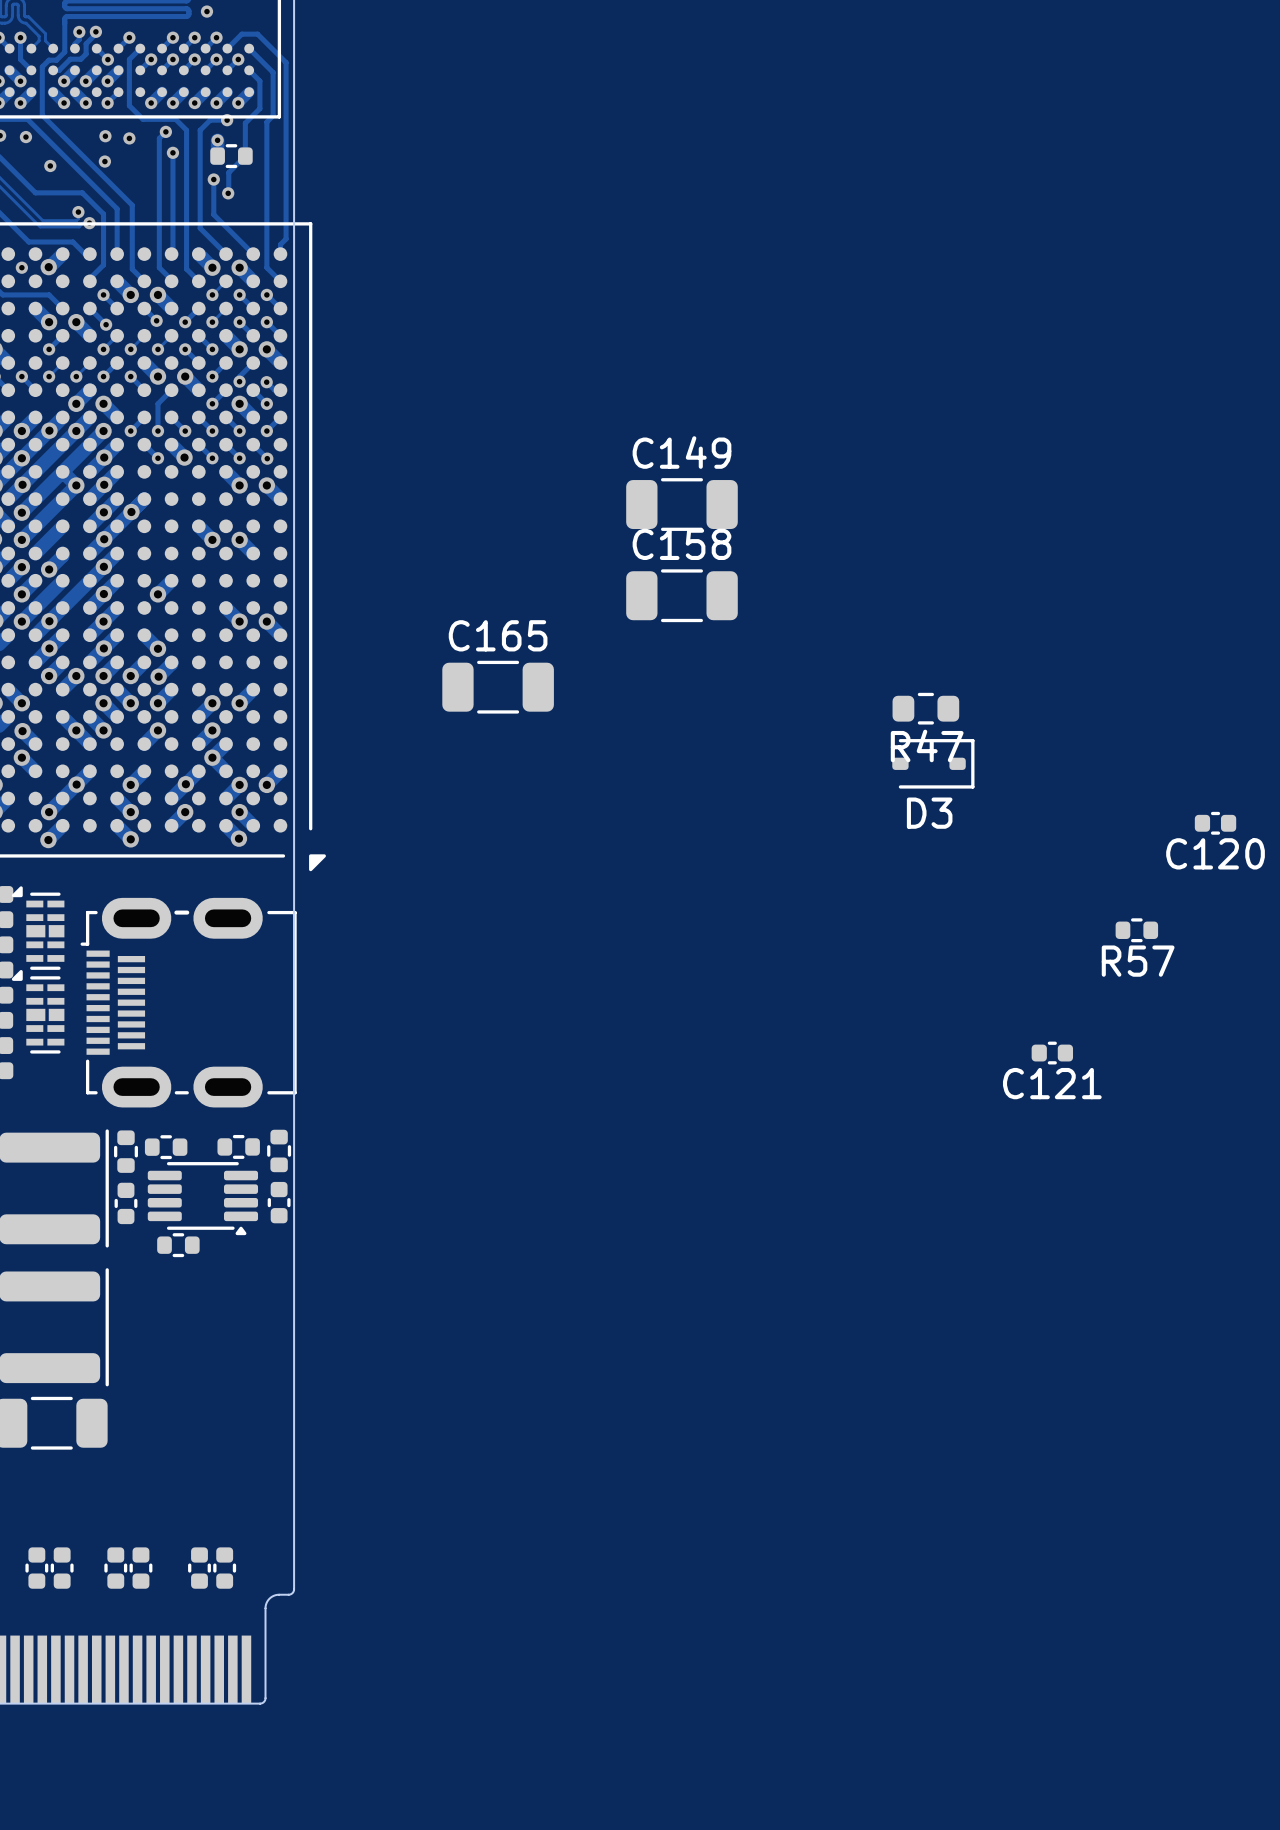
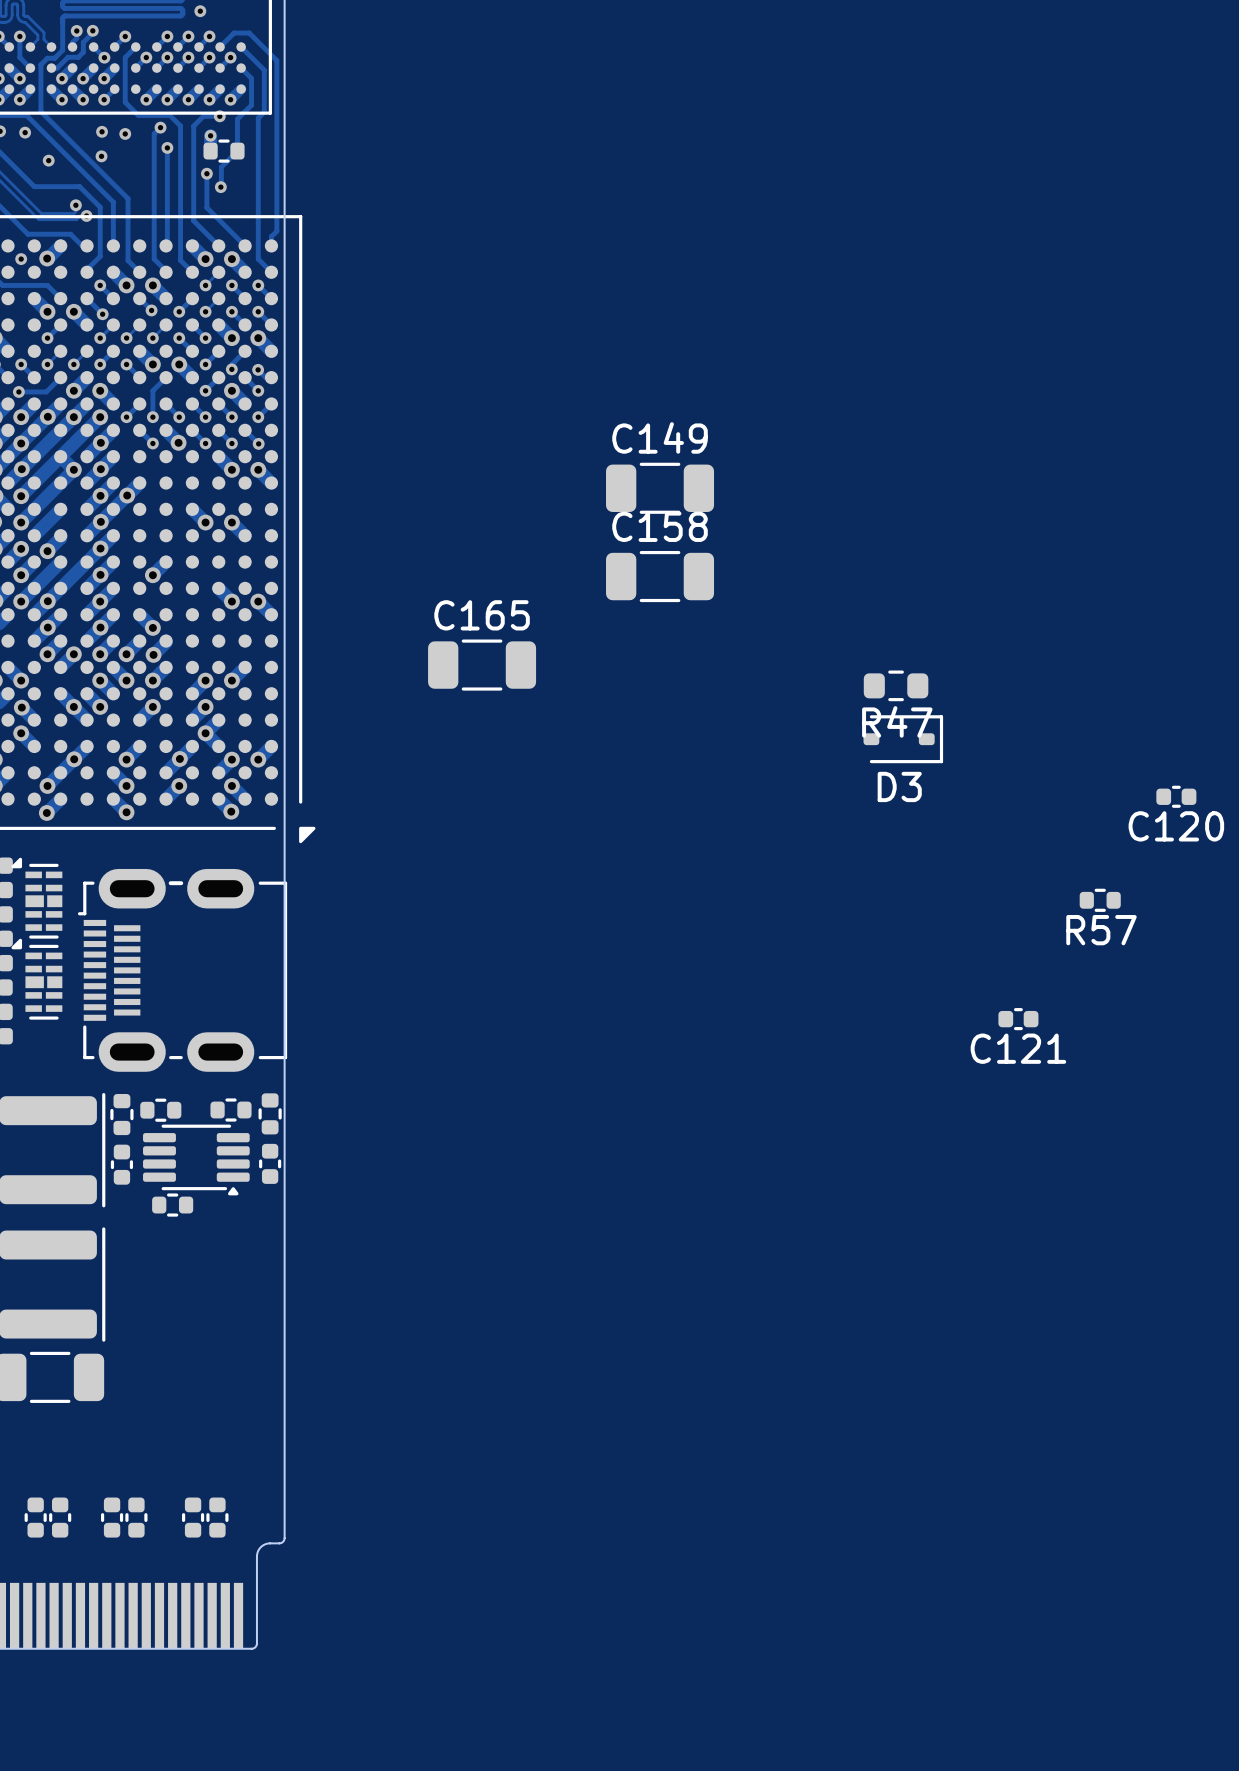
track: none -> (60, 377) (46, 391) (18, 391)
via: none -> (18, 391)

